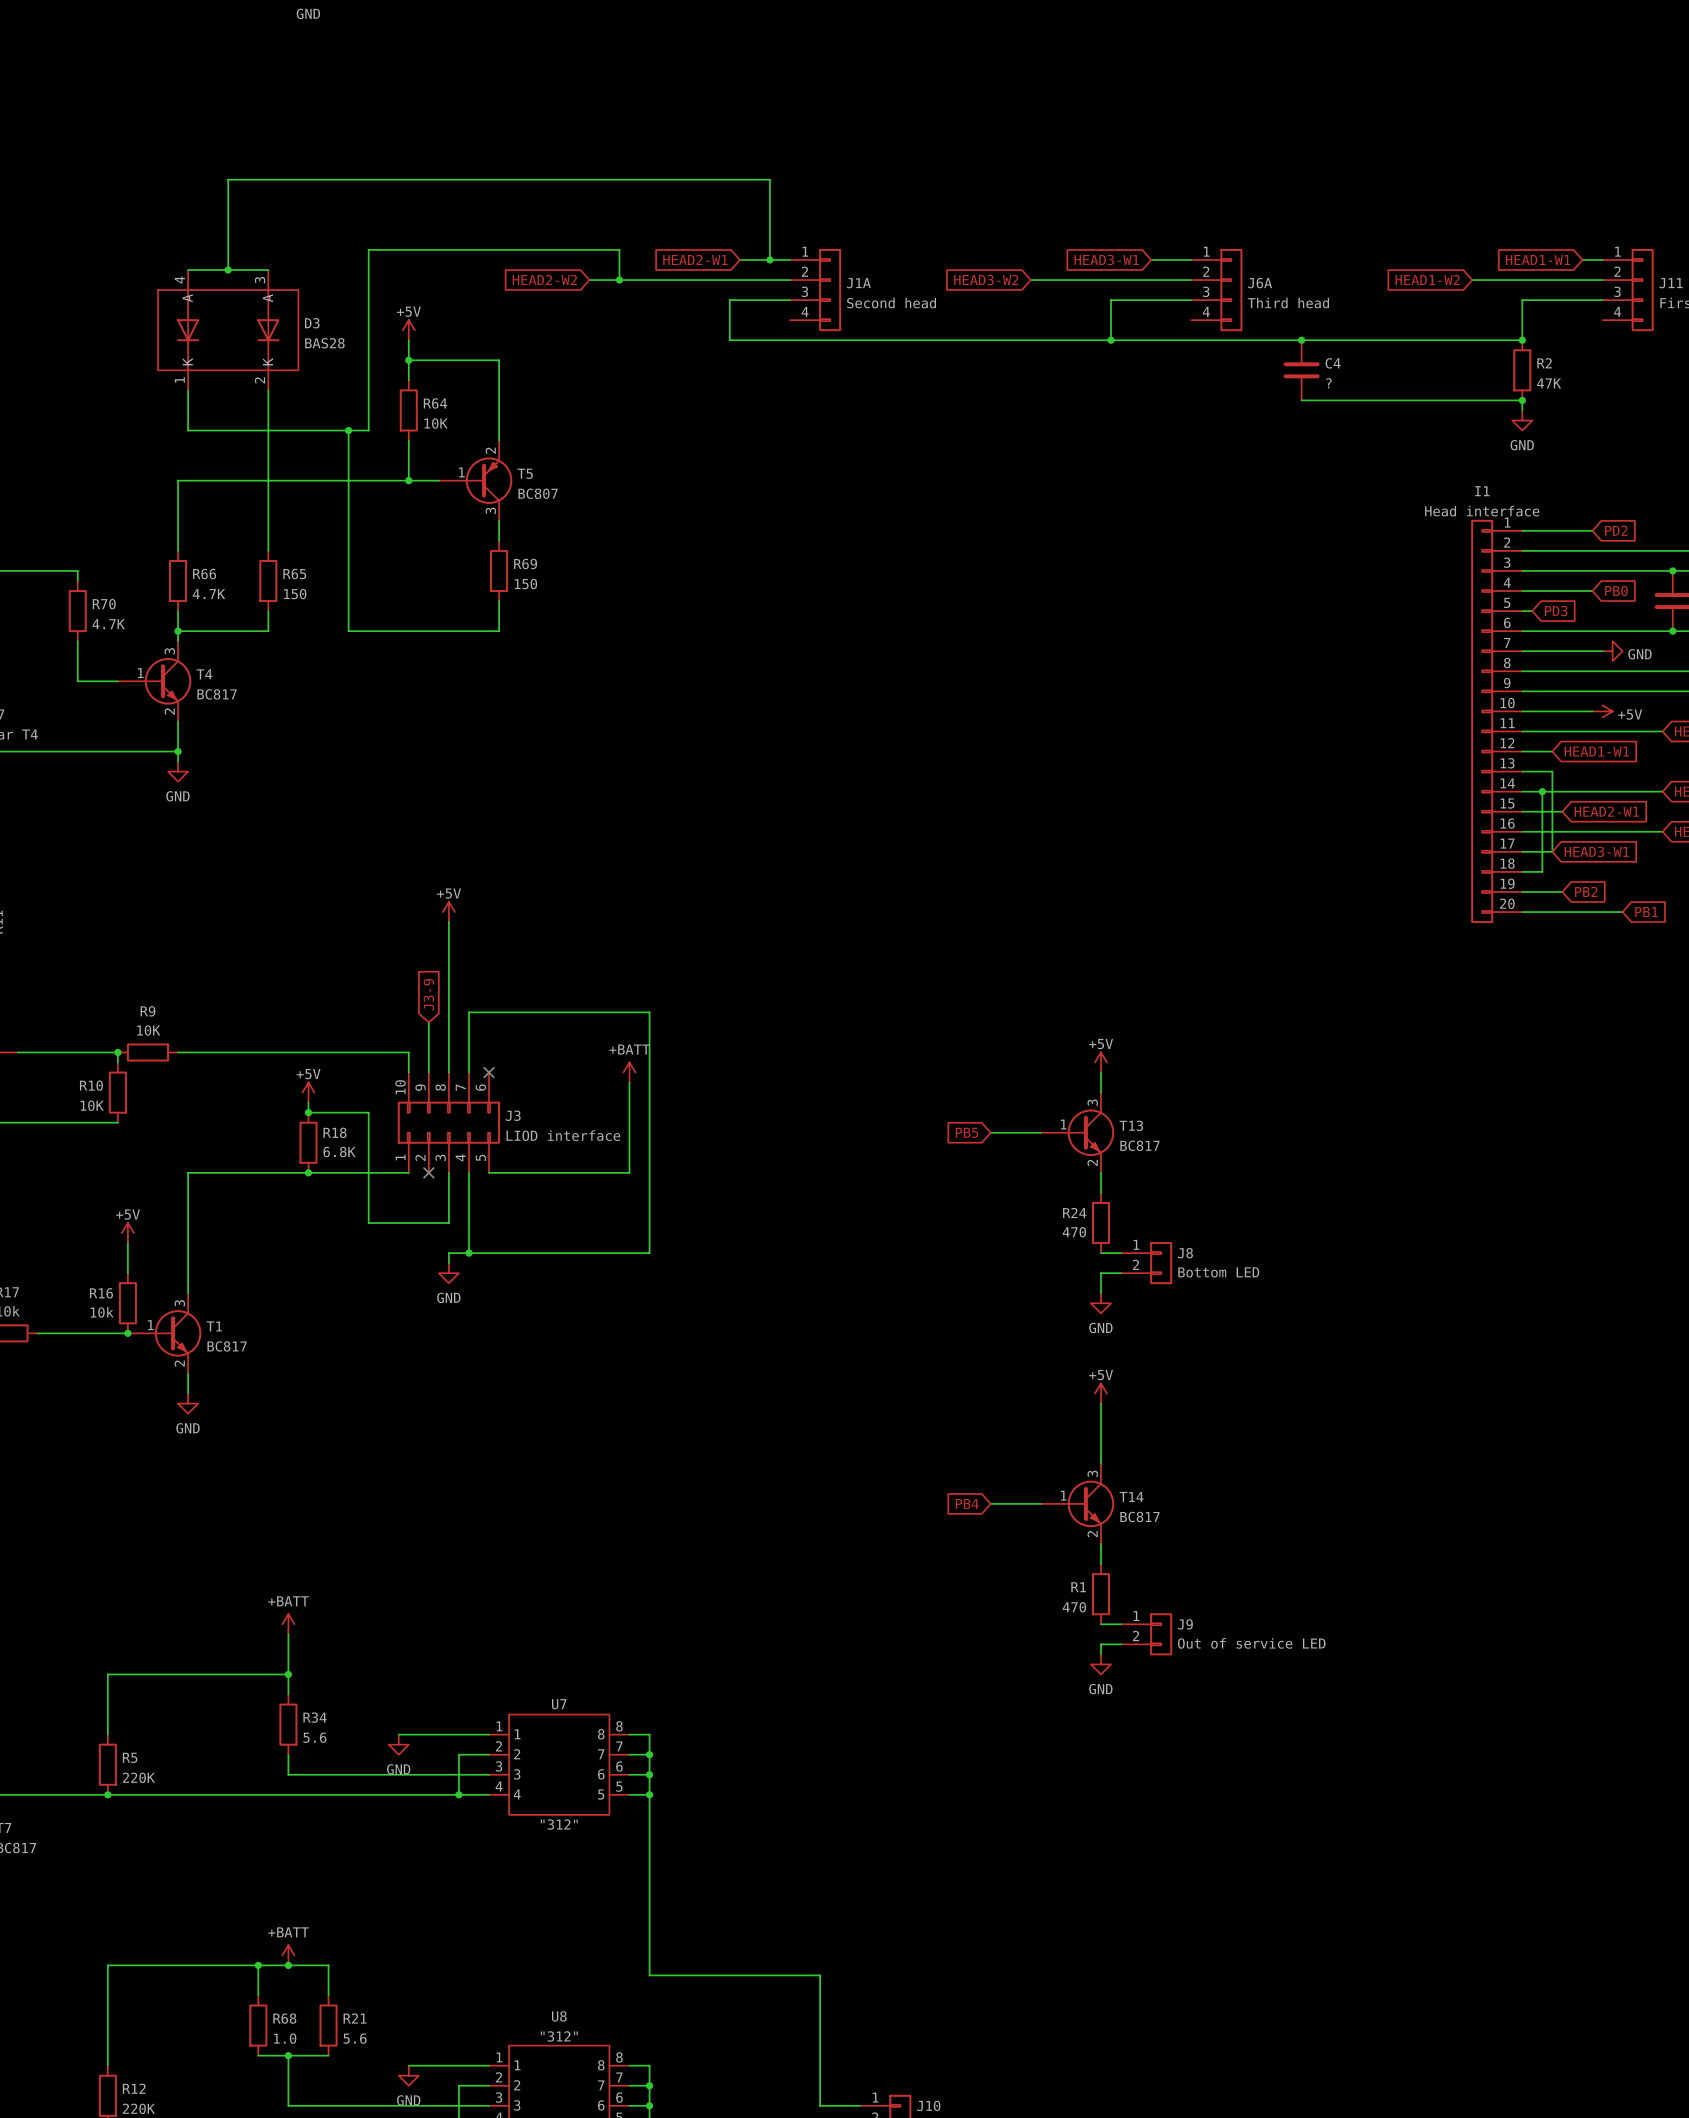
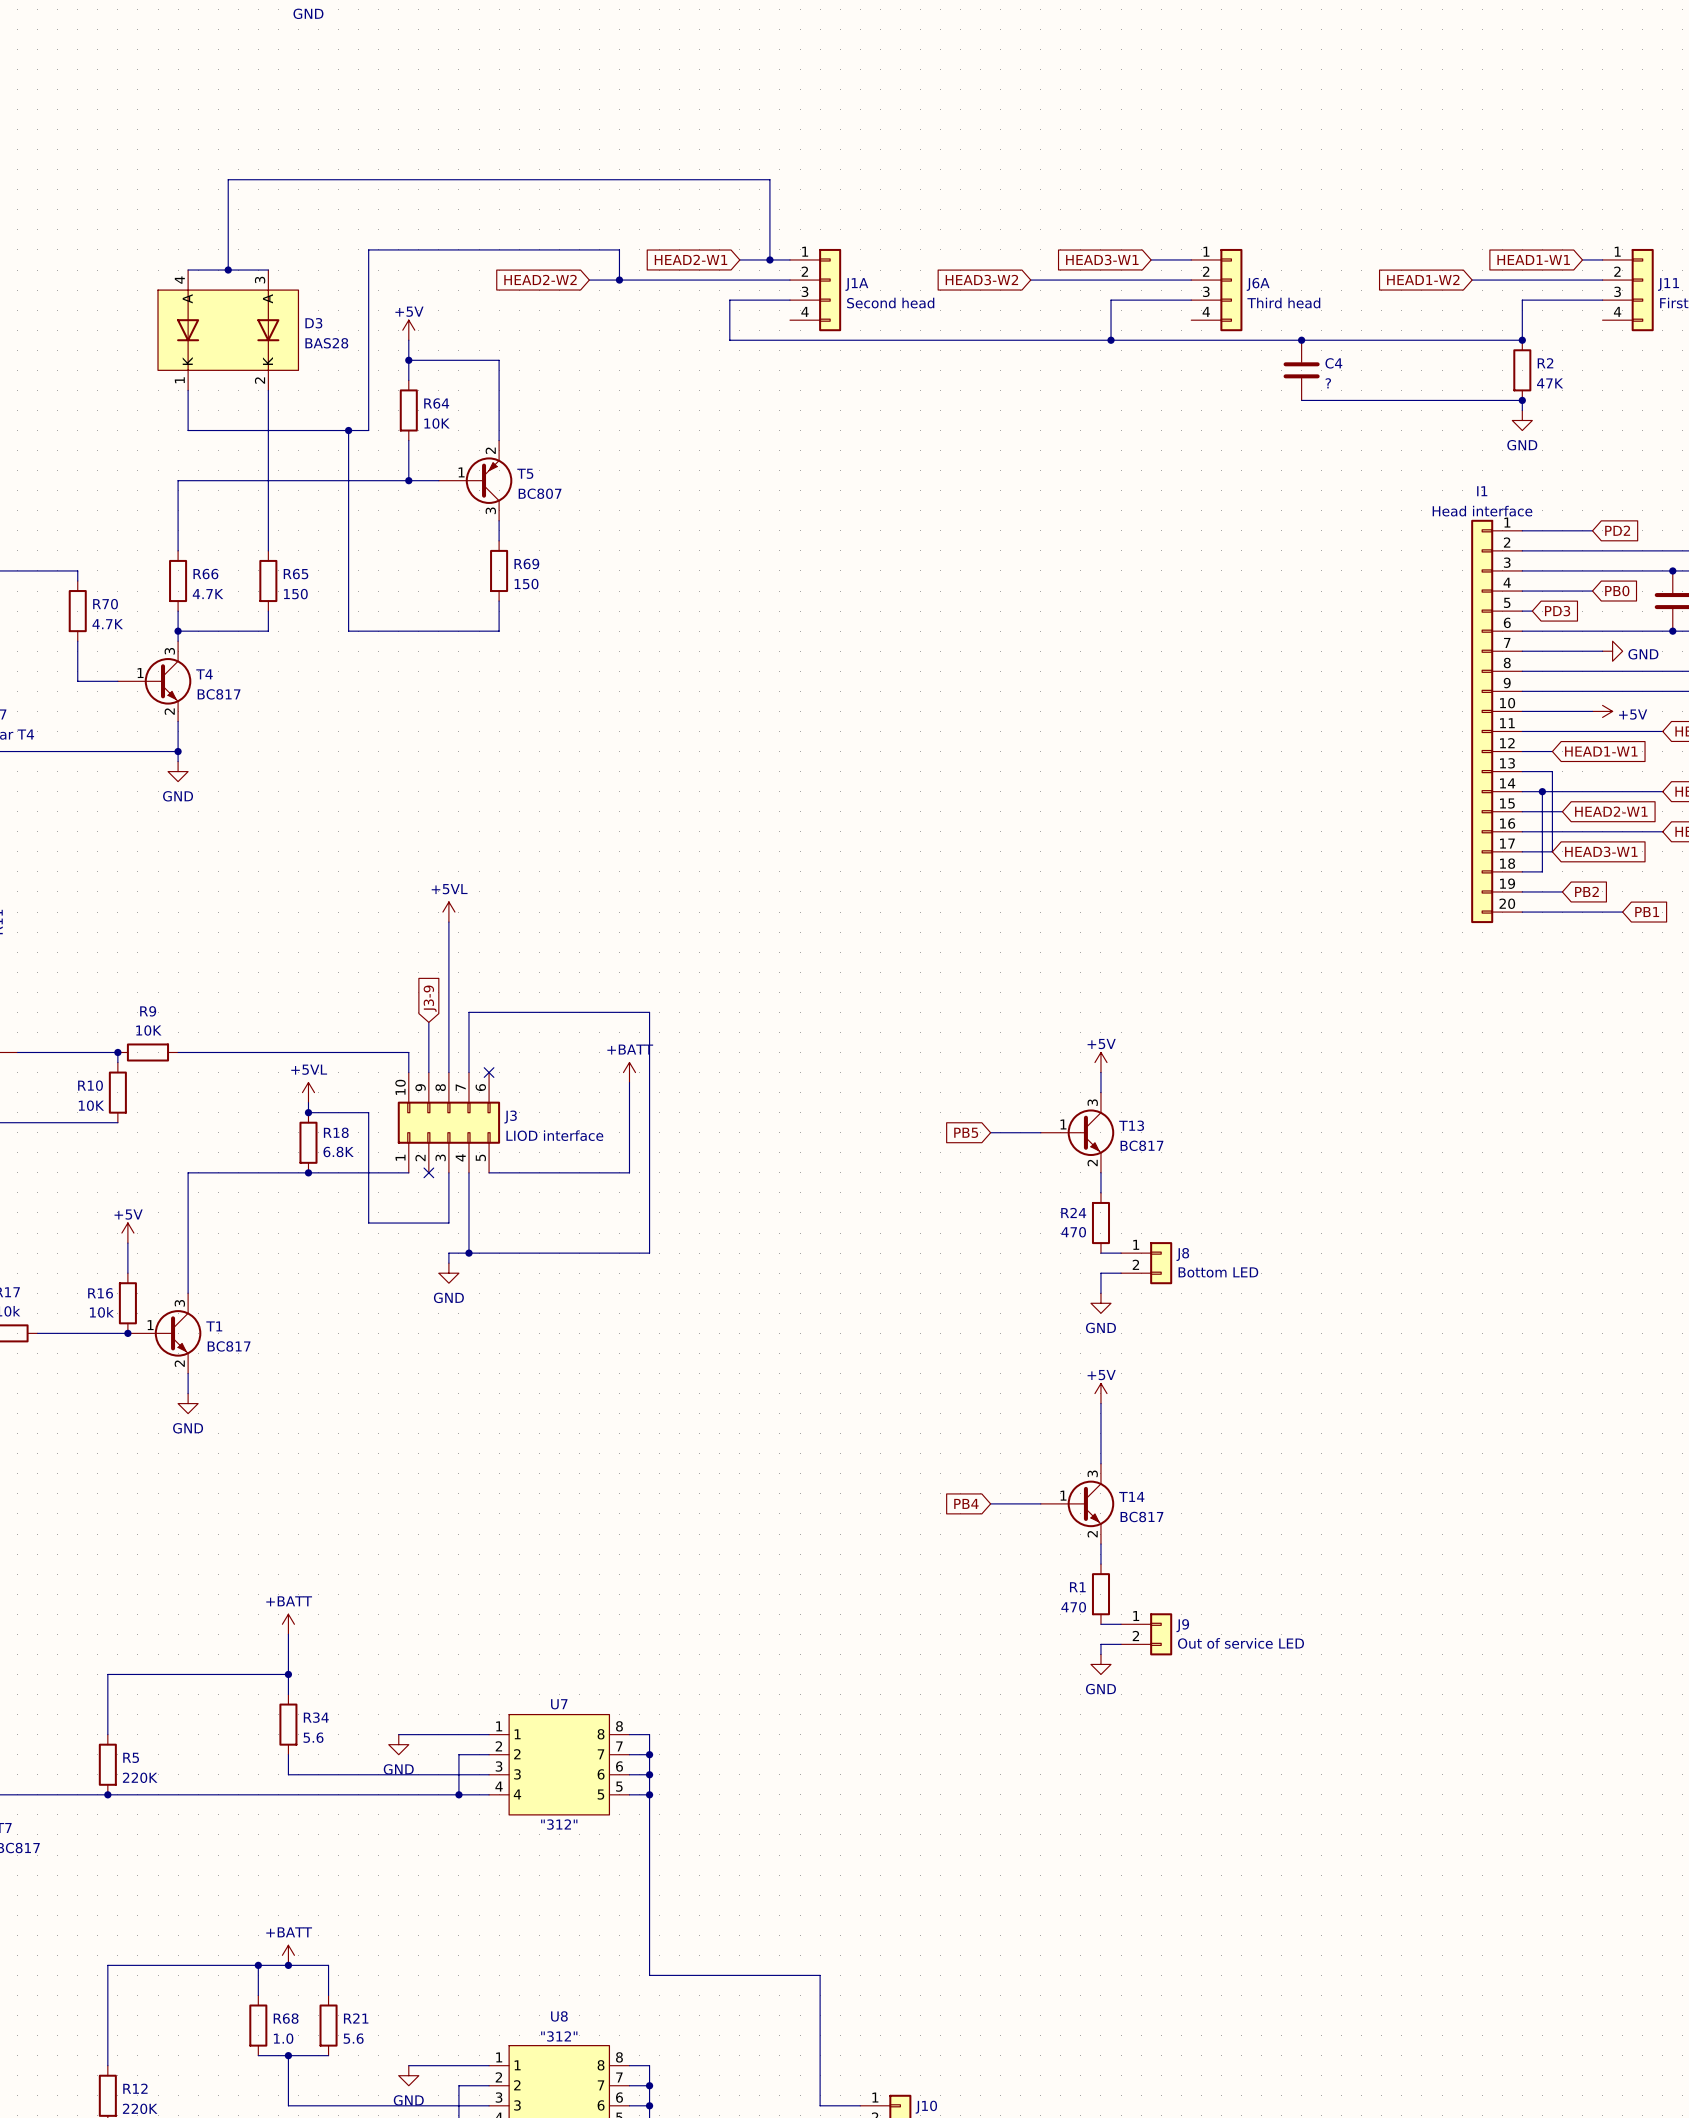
power symbol: +5V (448, 912) -> +5VL (448, 912)
power symbol: +5V (308, 1092) -> +5VL (308, 1092)

